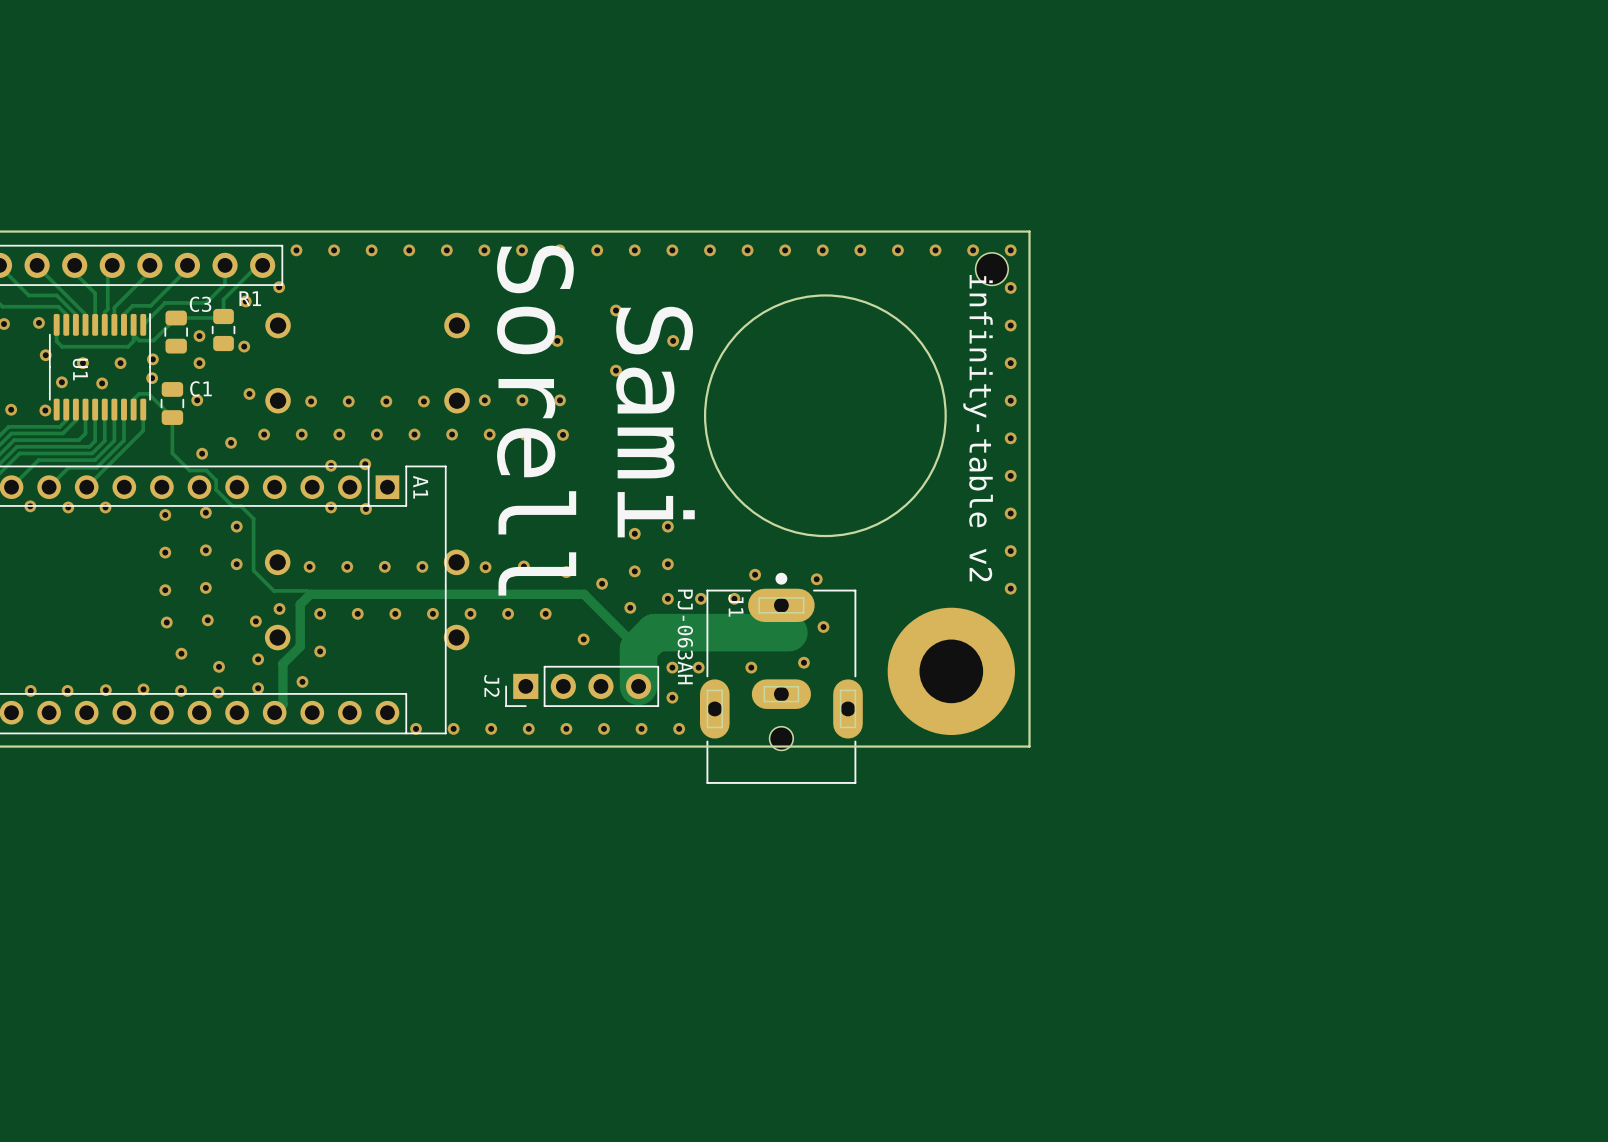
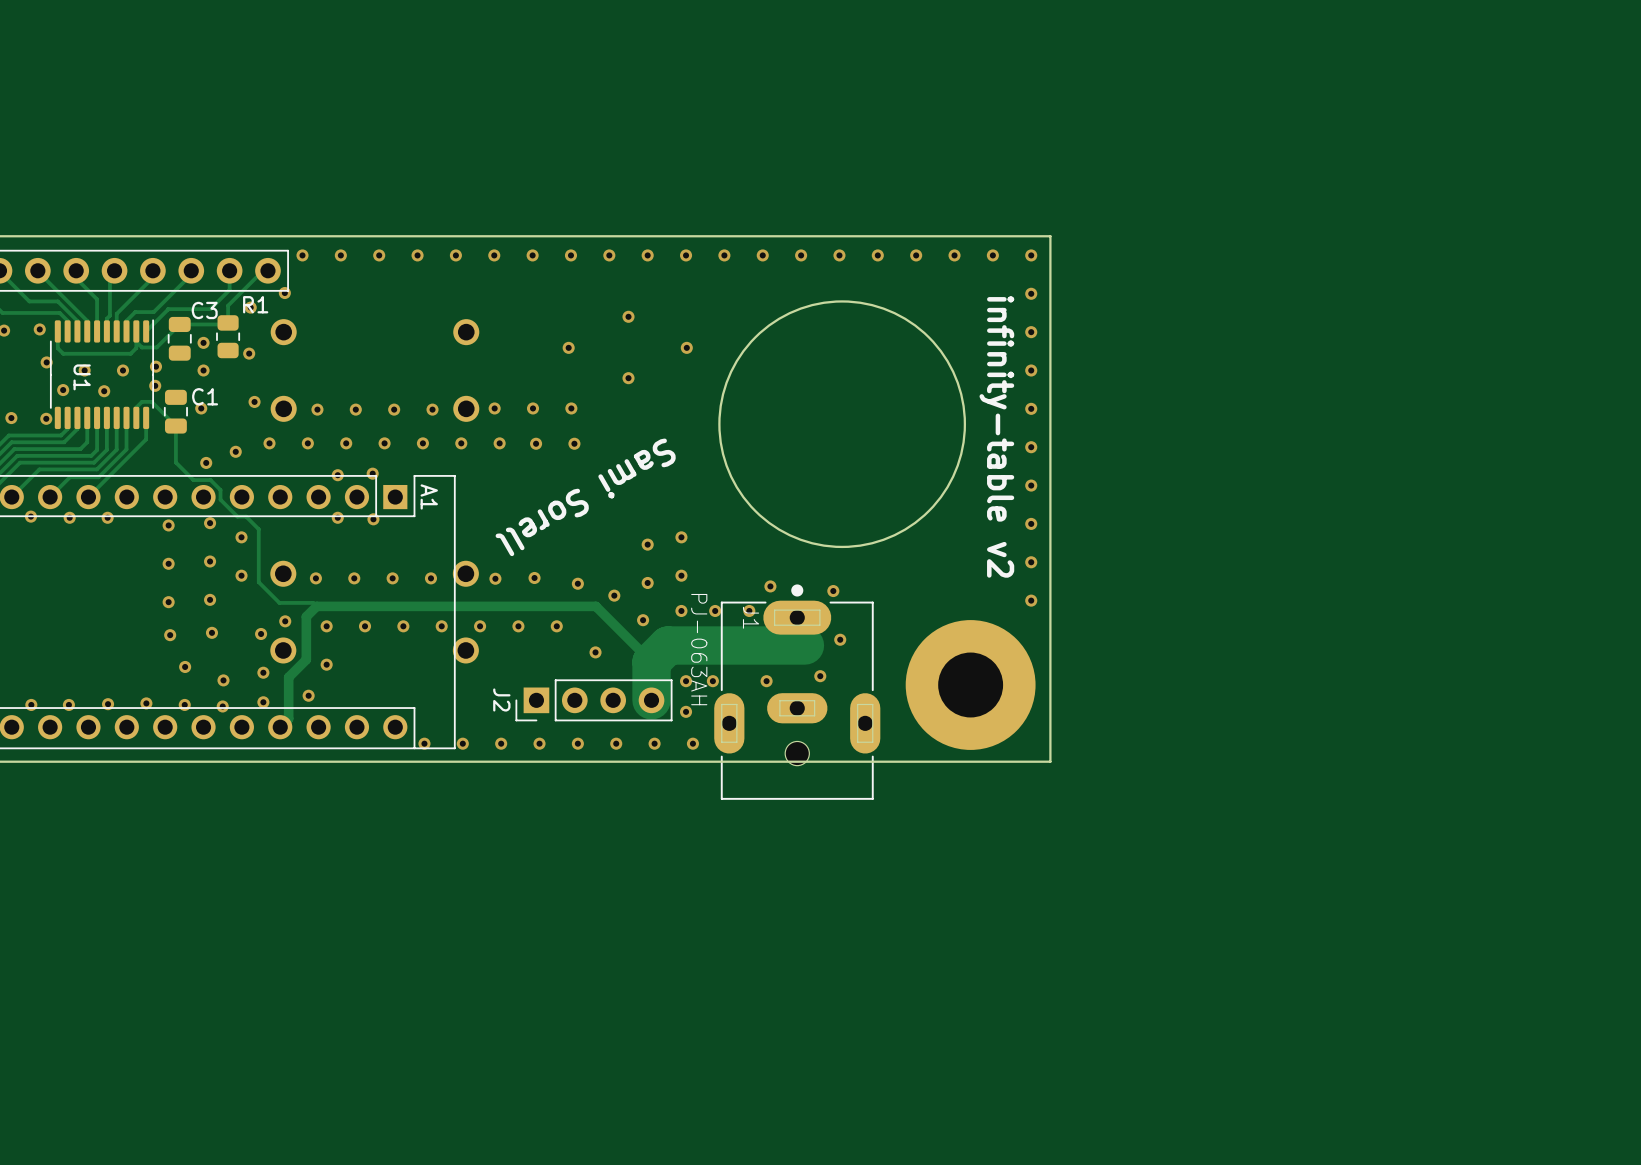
part: (991, 269) -> none
text: Sorell (536, 420) -> Sami Sorell (585, 497)
text: Sami (655, 422) -> none

